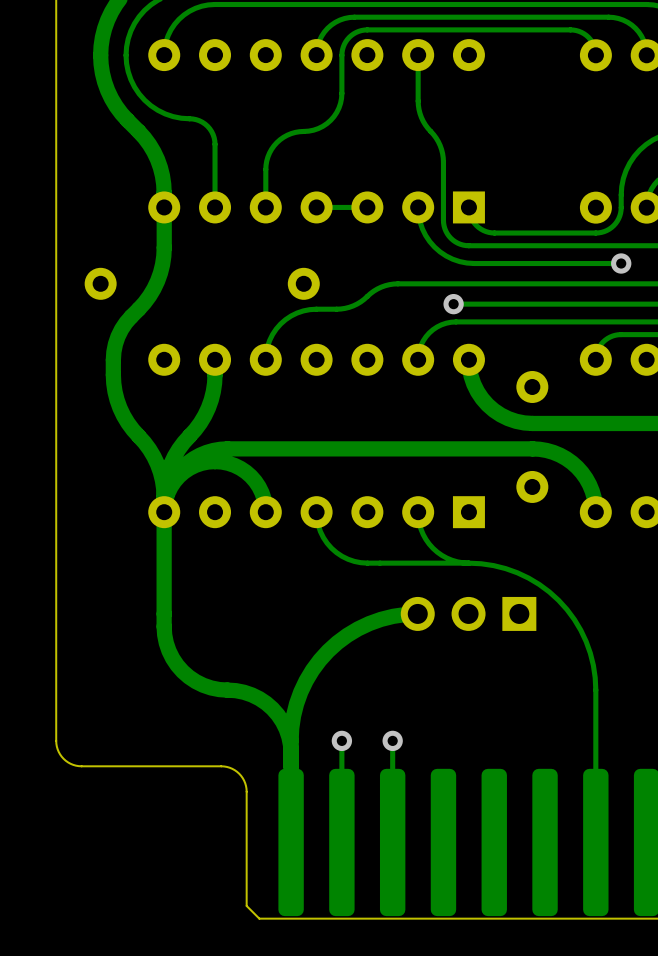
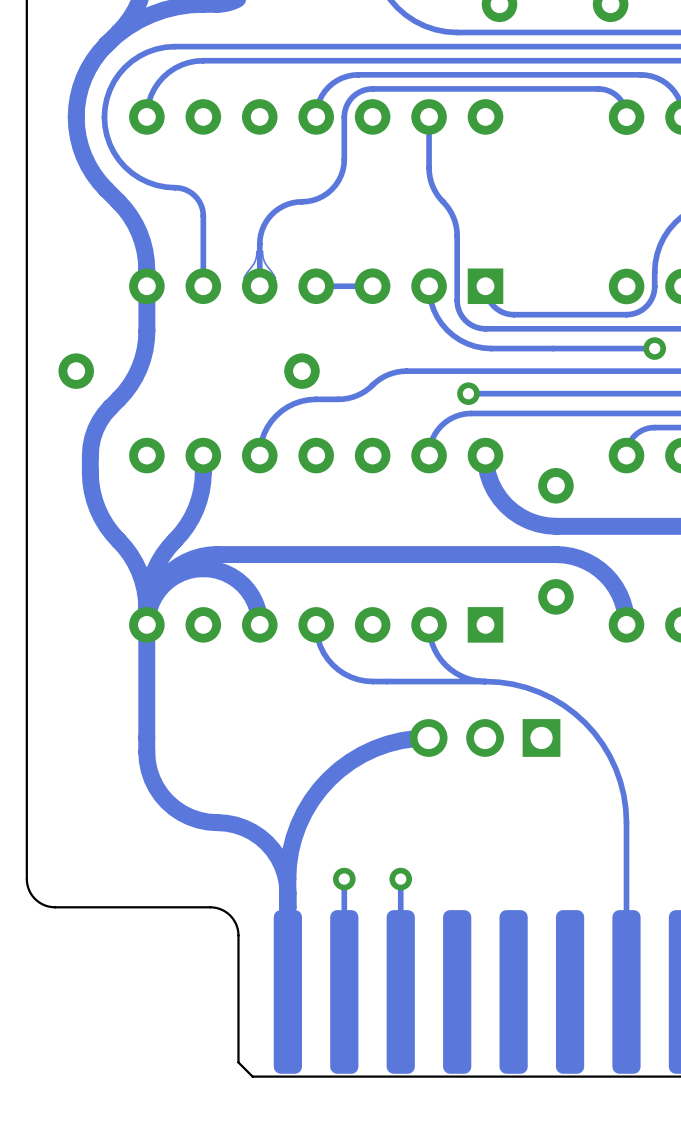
zone outline: none -> (262, 250) (264, 261) (275, 278) (259, 295) (243, 278) (255, 261) (256, 250) (262, 250)

